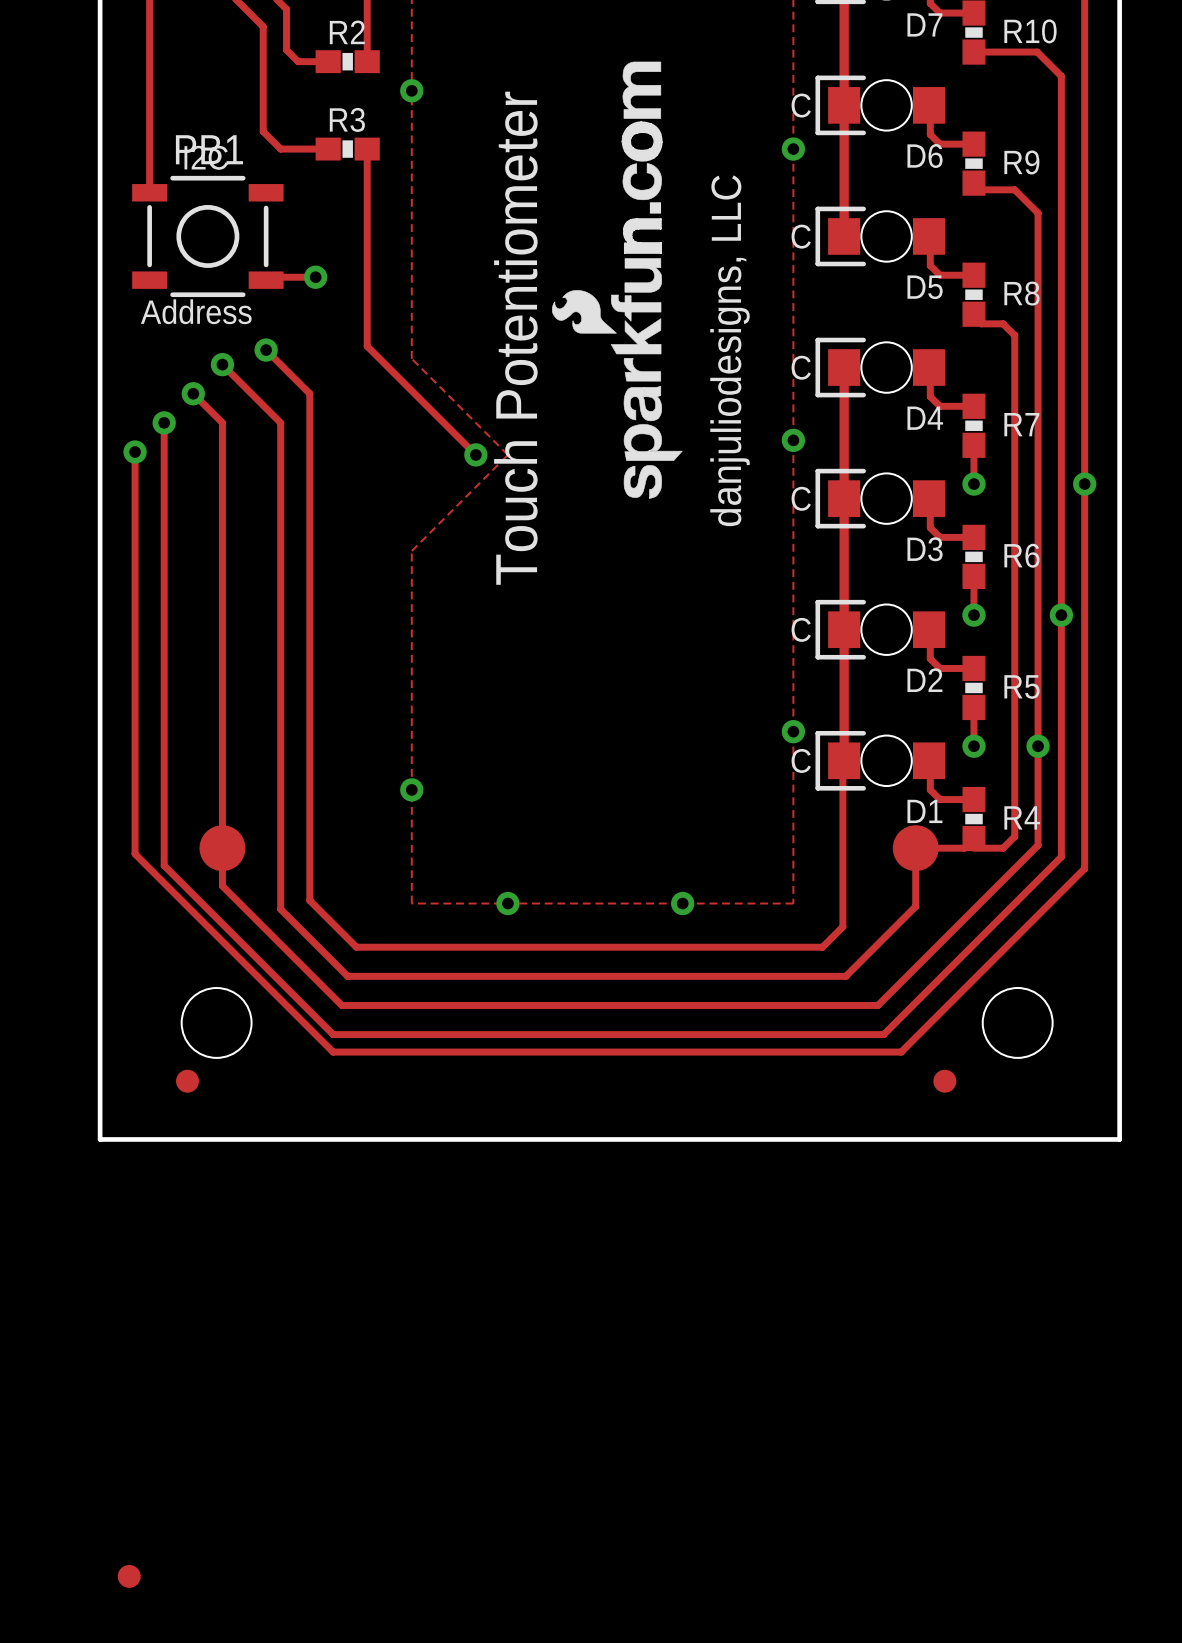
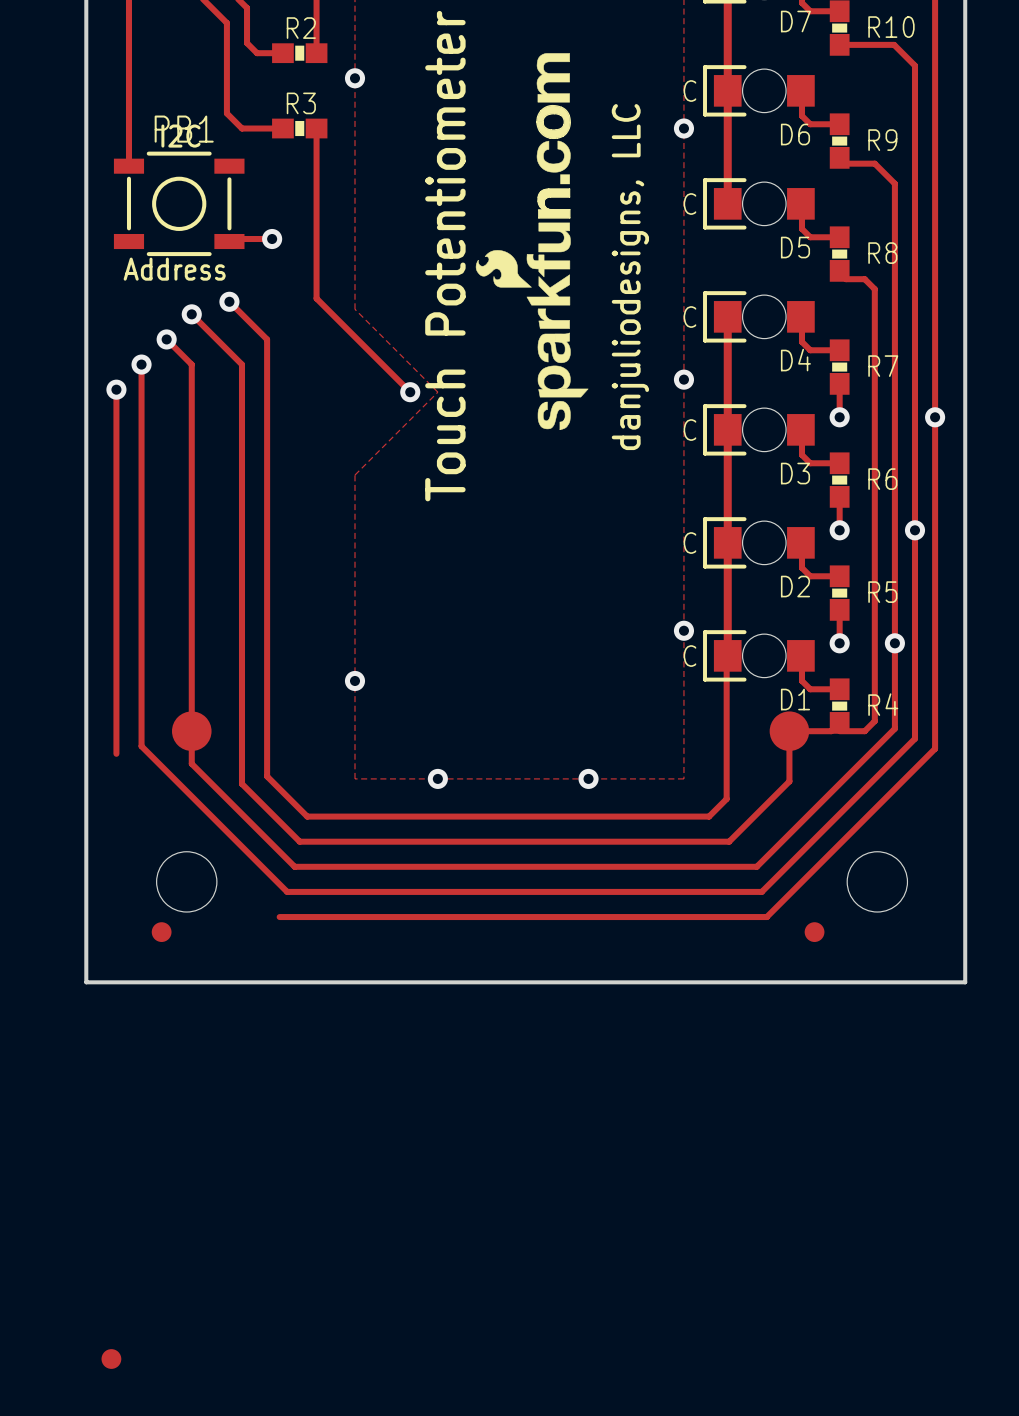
track: (135, 854) (333, 1052) (901, 1052) -> (279, 917) (766, 917) (776, 906)
track: none -> (116, 736) (116, 753)

